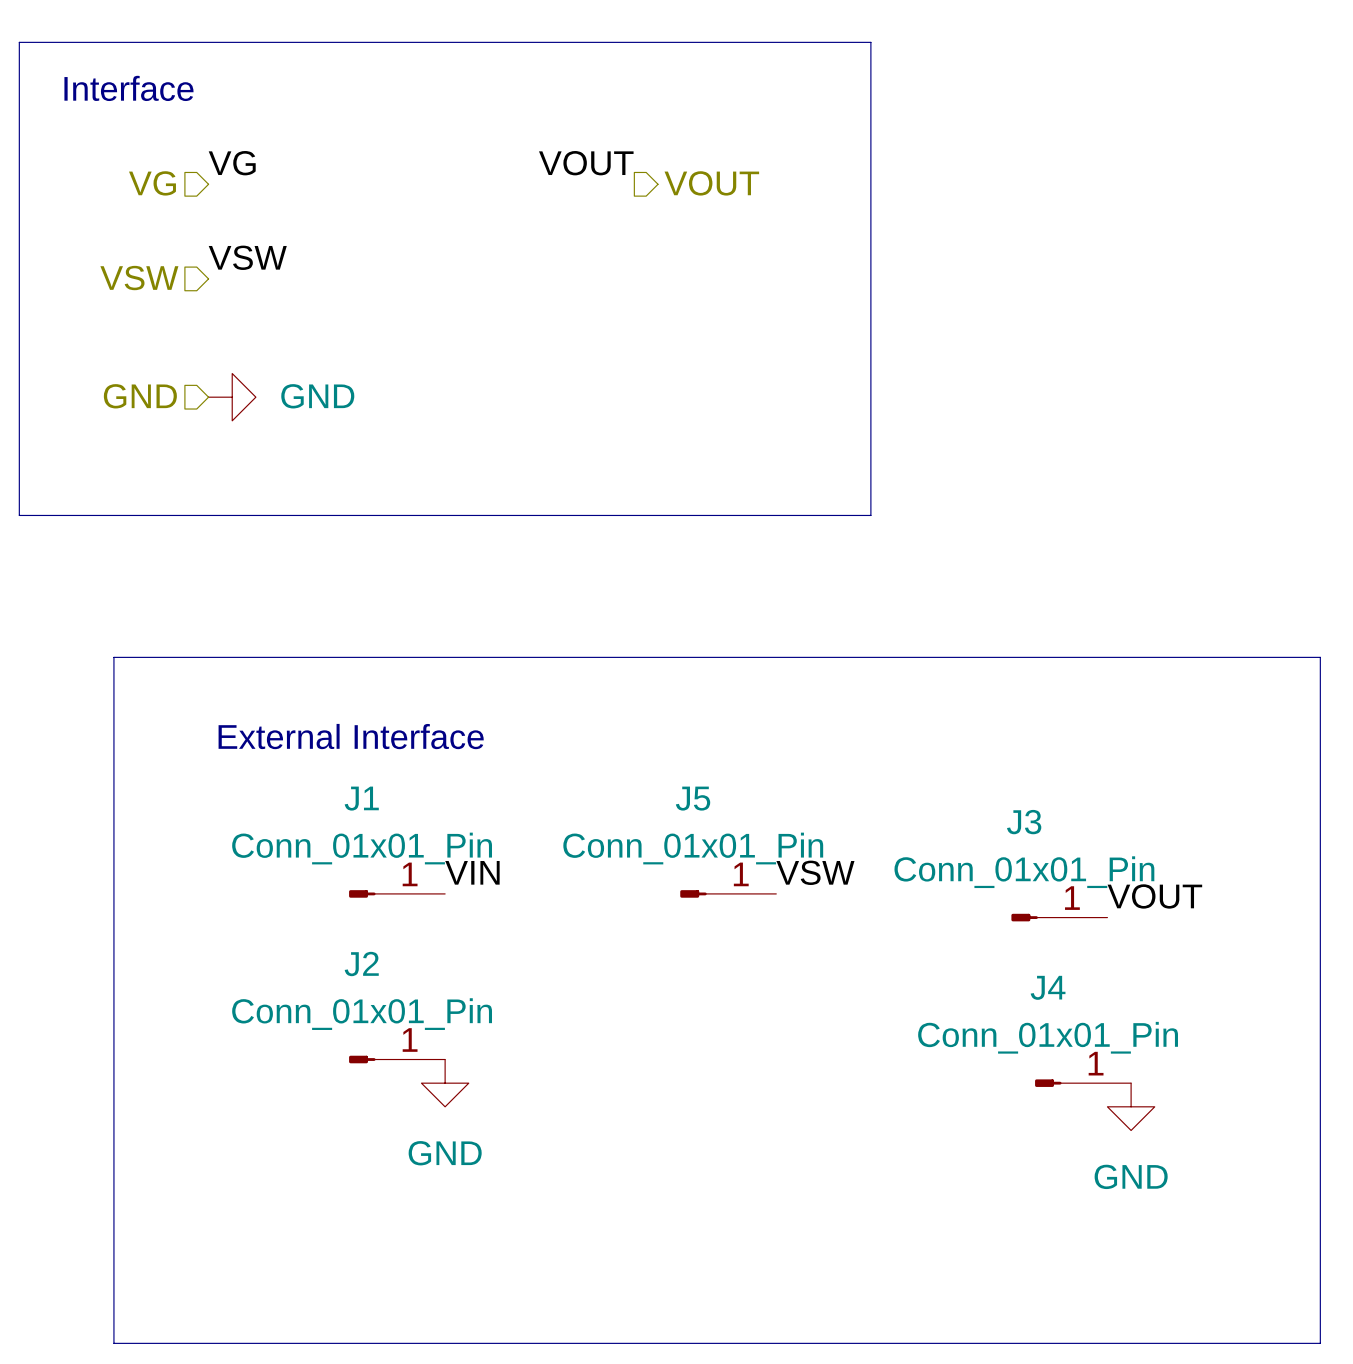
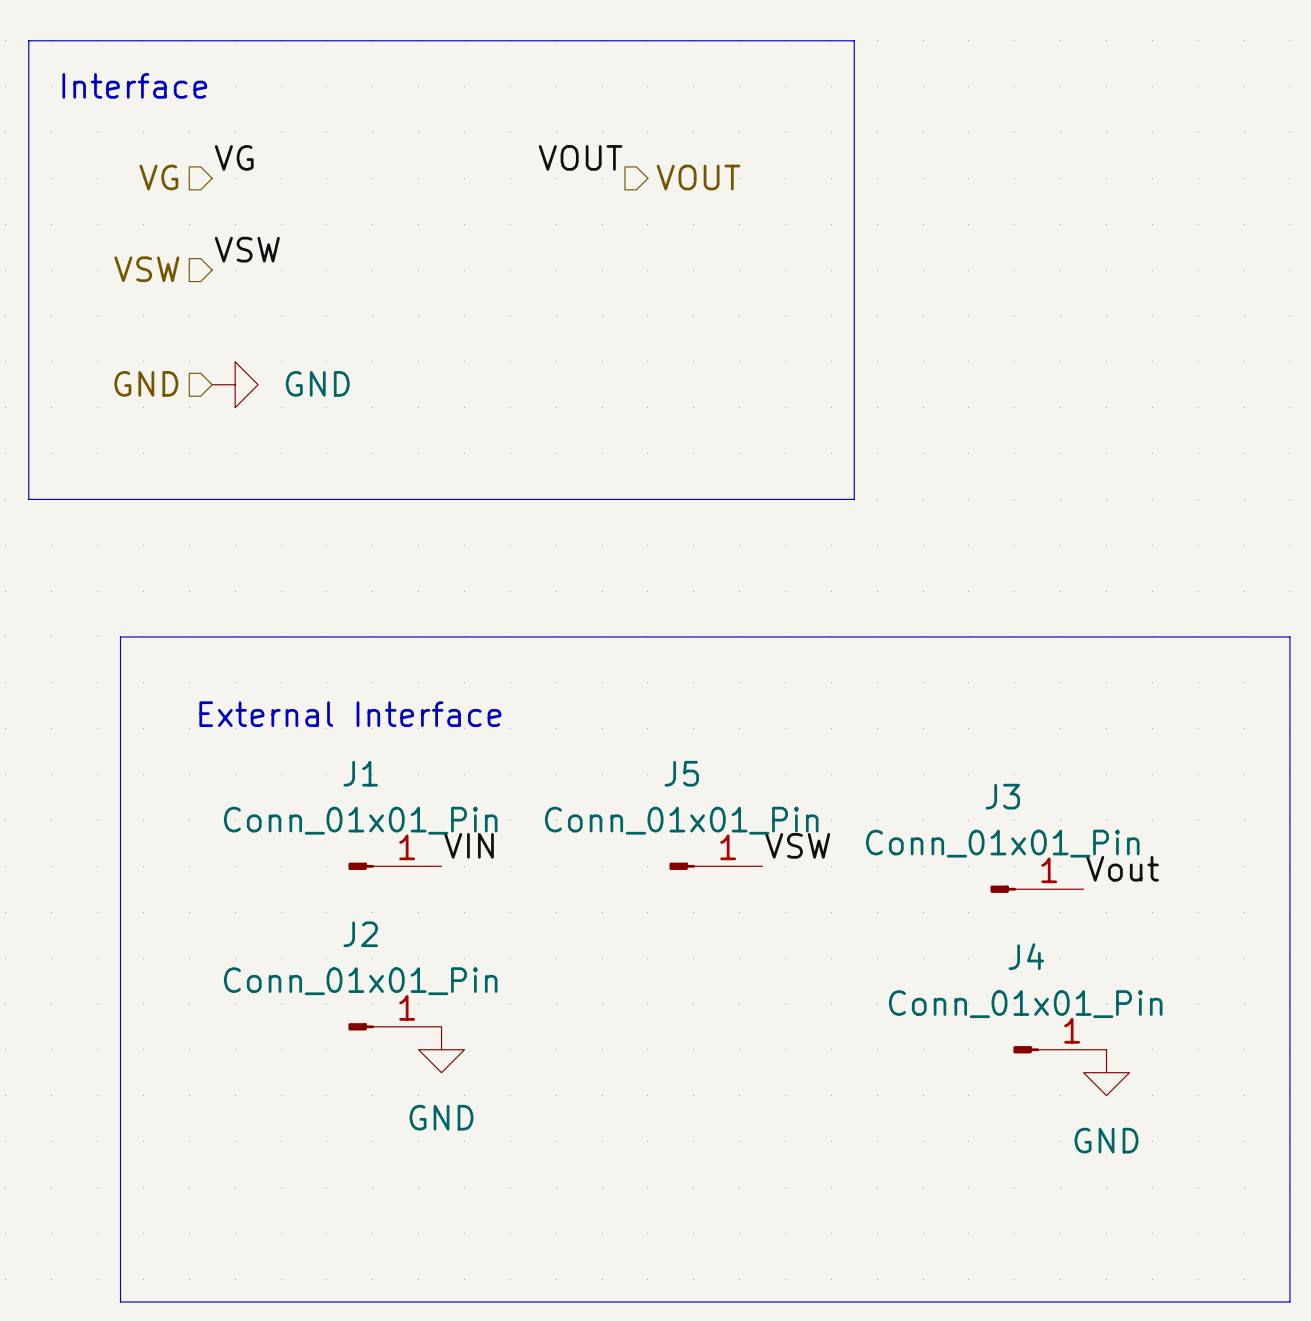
label: VOUT (1154, 896) -> Vout (1122, 868)

